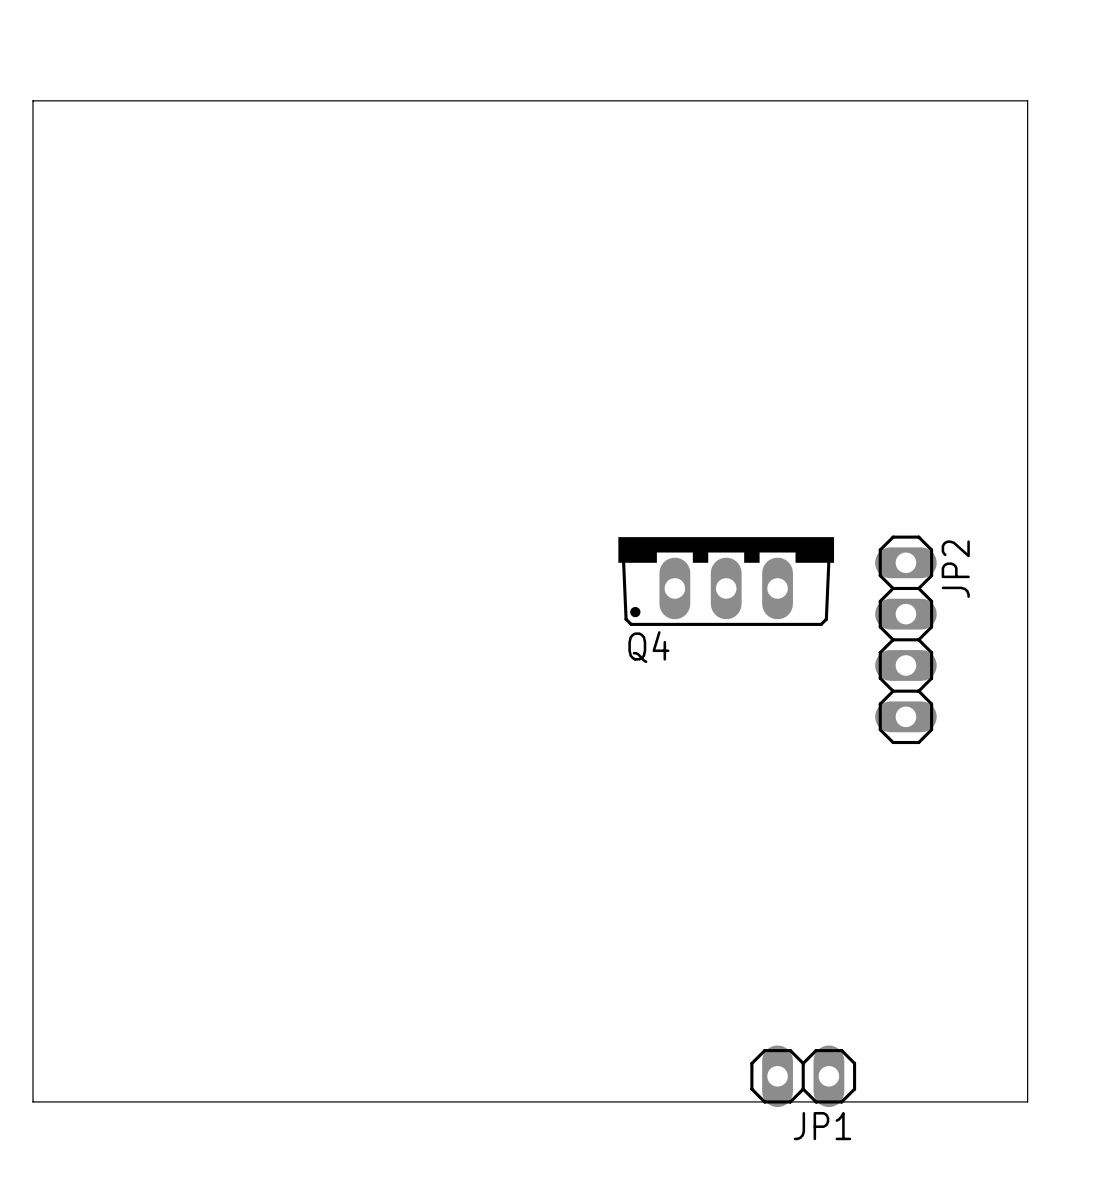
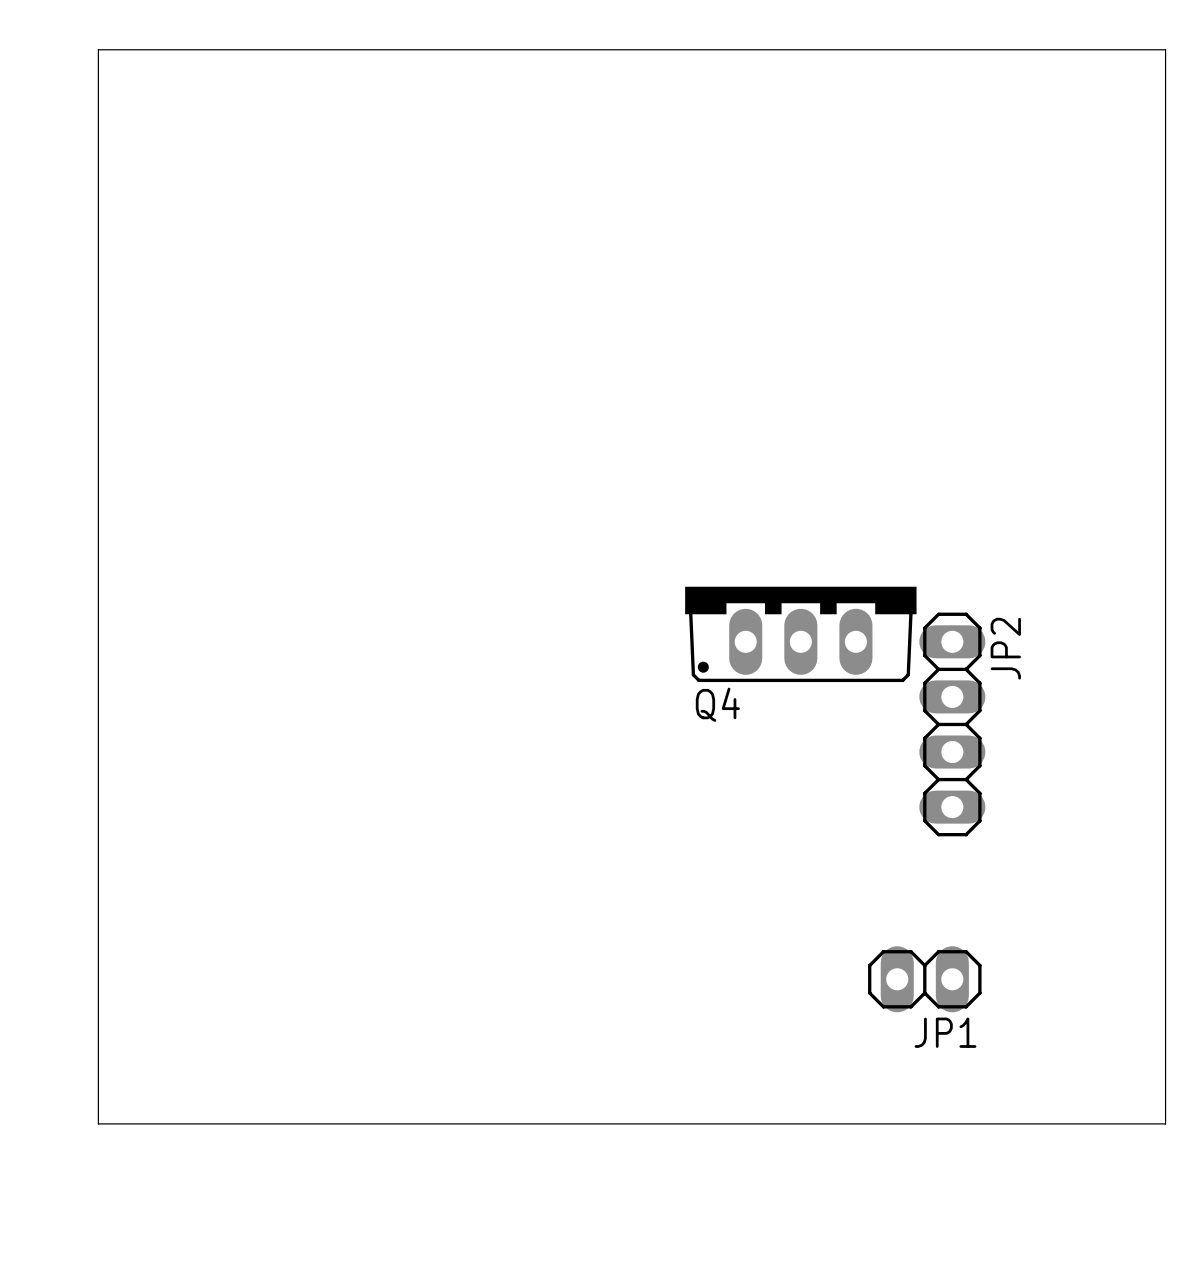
Q4 position: (726, 581) -> (800, 634)
JP2 position: (905, 639) -> (952, 724)
JP1 position: (803, 1076) -> (924, 979)

